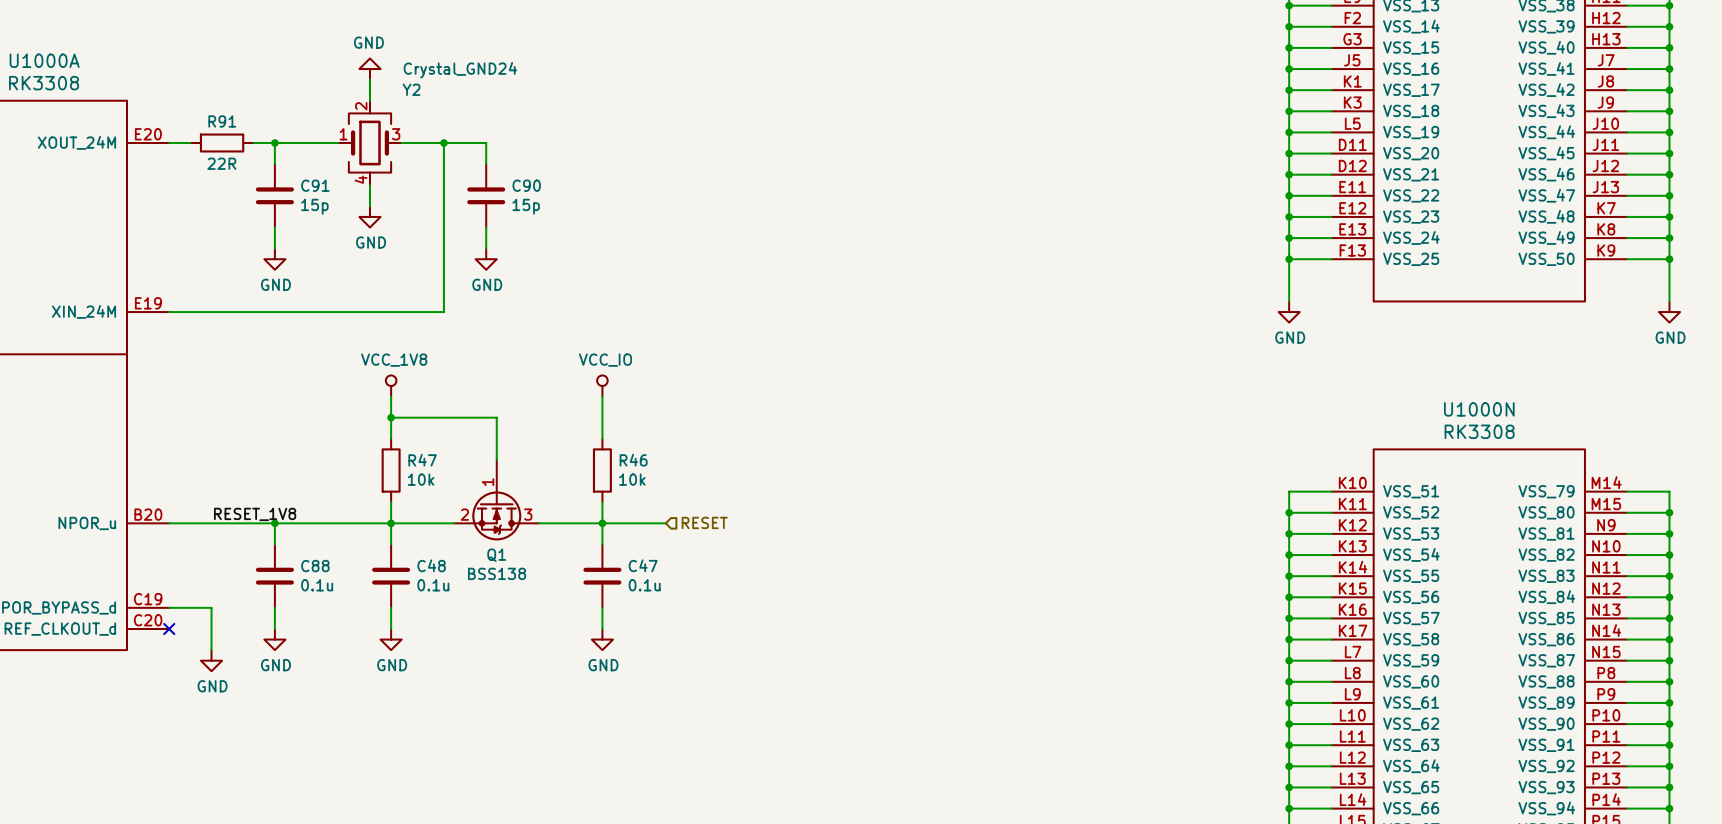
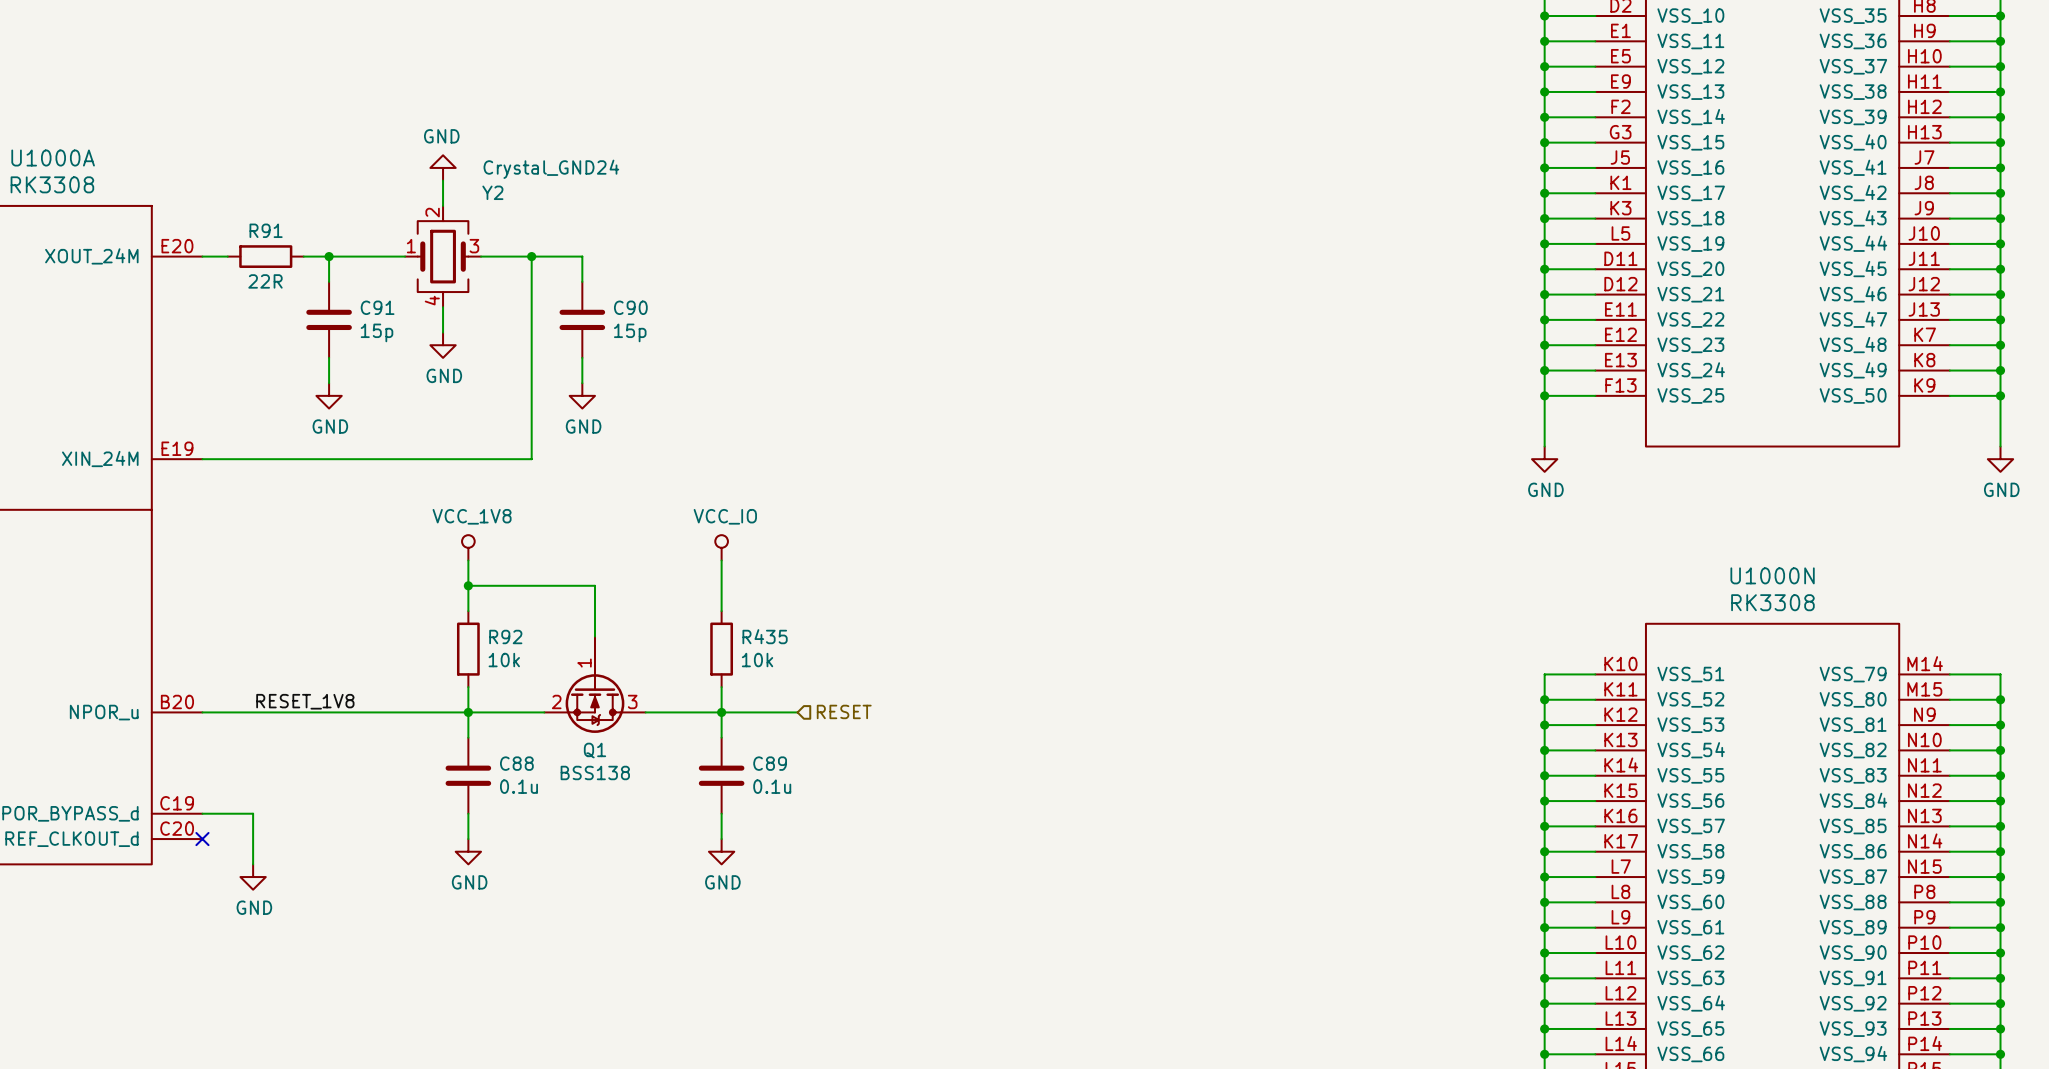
R47 name: R47 (422, 460) -> R92 (505, 636)
R46 name: R46 (633, 460) -> R435 (765, 636)
wire: (274, 523) (274, 544) -> none
junction: (274, 523) -> none
C48 name: C48 (431, 565) -> C88 (516, 763)
C47 name: C47 (643, 565) -> C89 (770, 763)
C88: 0.1u (274, 576) -> none
wire: (274, 607) (274, 628) -> none
power symbol: GND (274, 639) -> none

